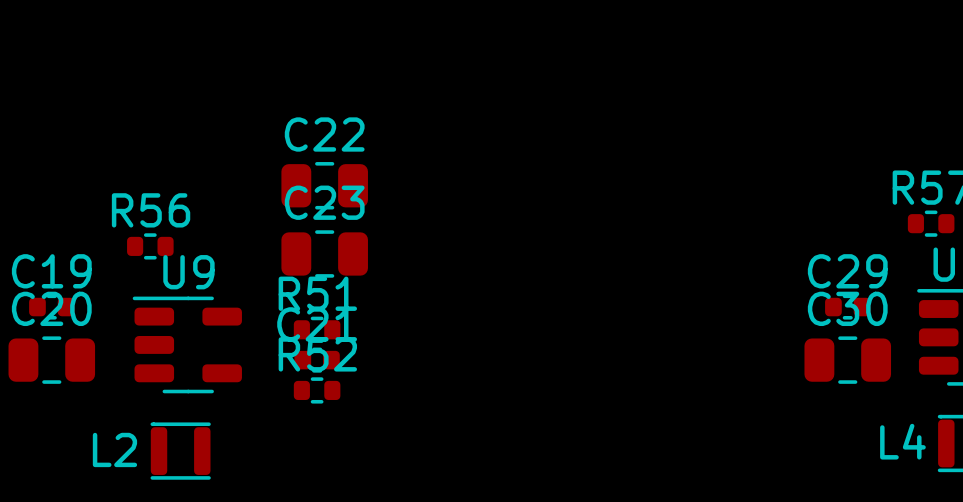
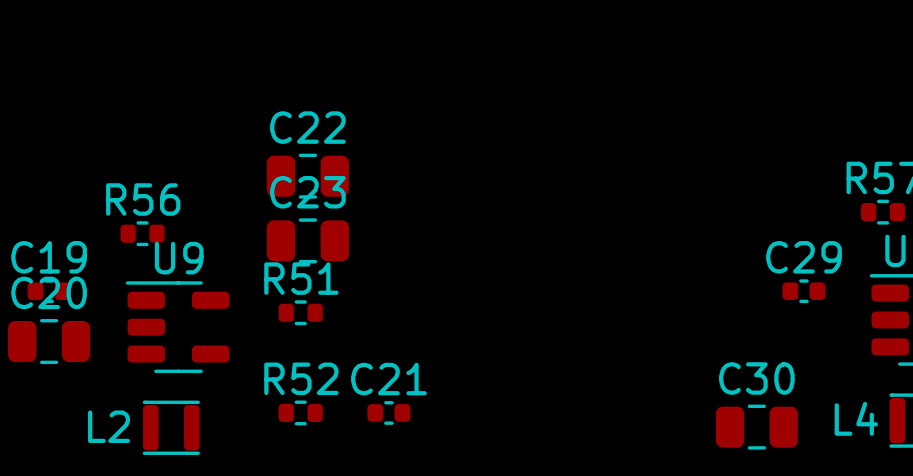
C21 position: (317, 360) -> (388, 412)
C30 position: (847, 360) -> (756, 427)
R52 position: (317, 390) -> (300, 412)

